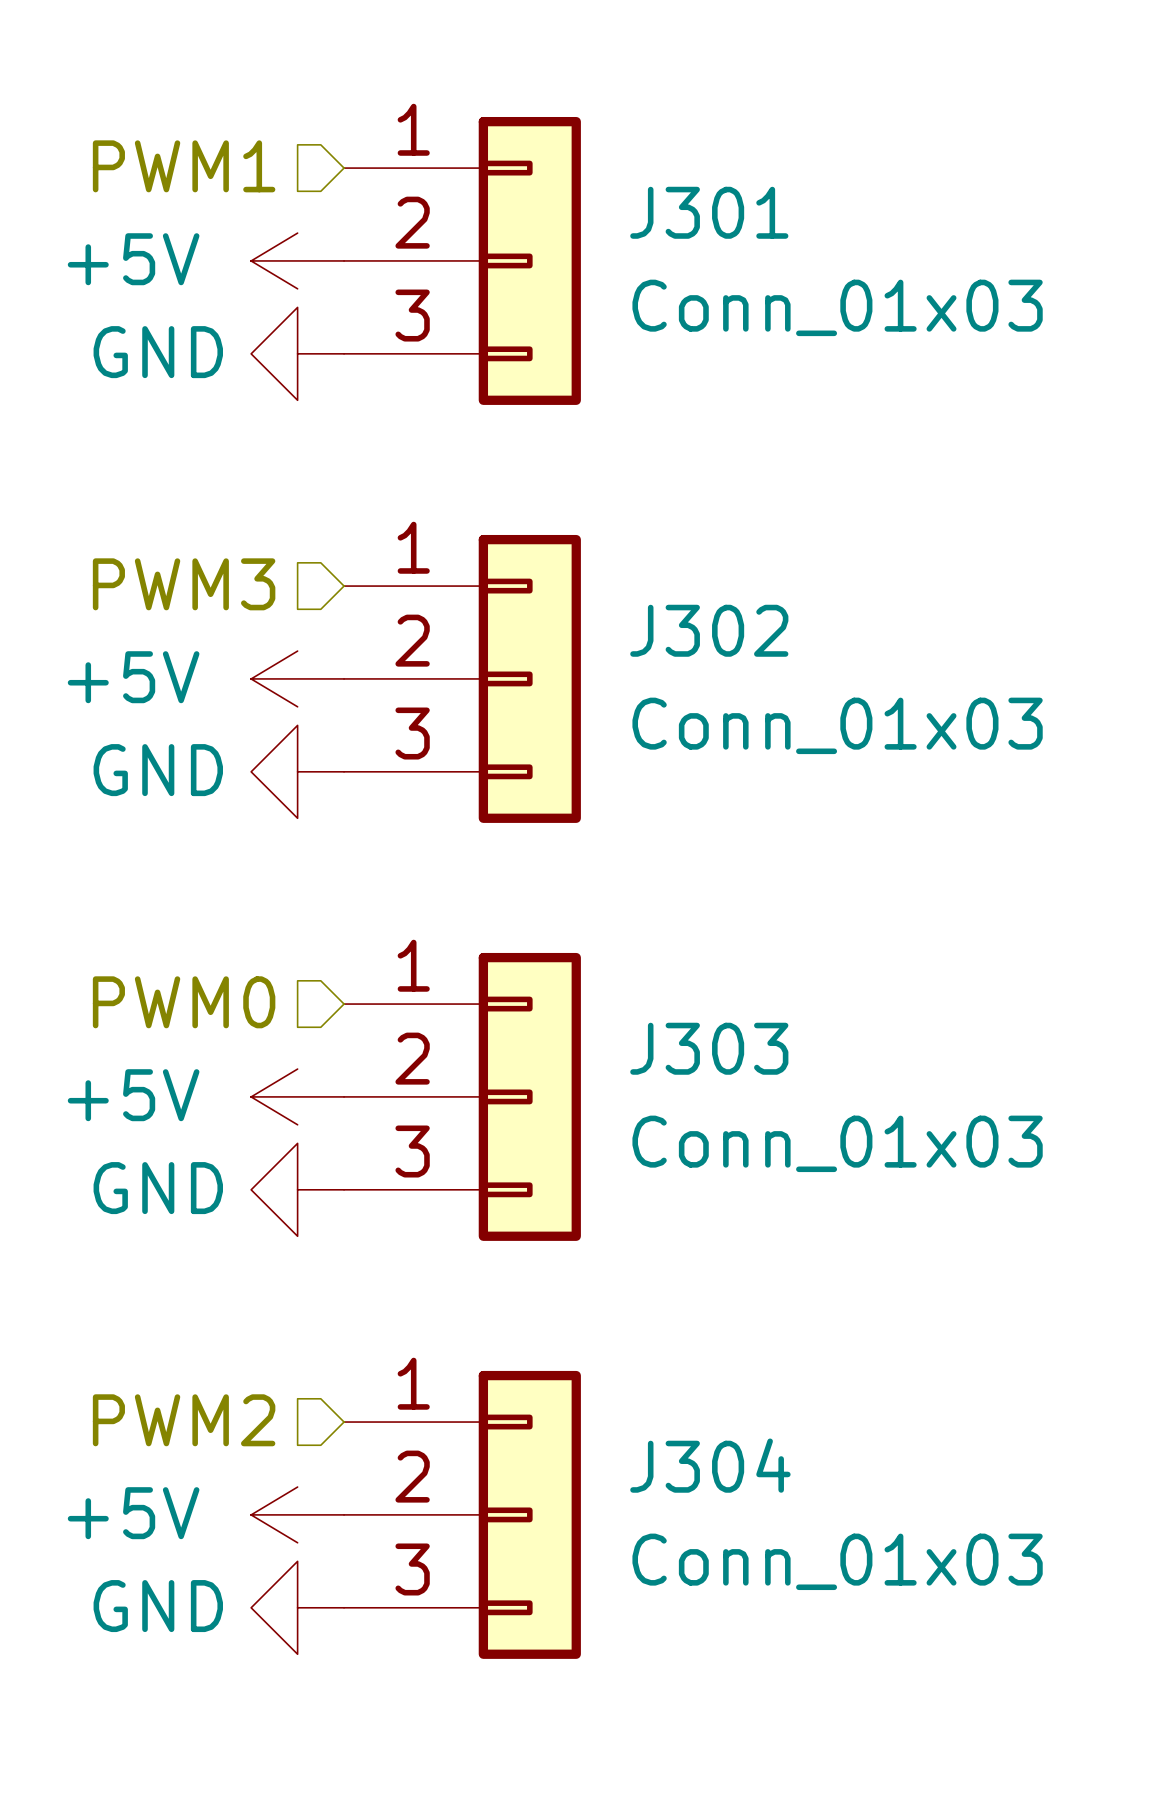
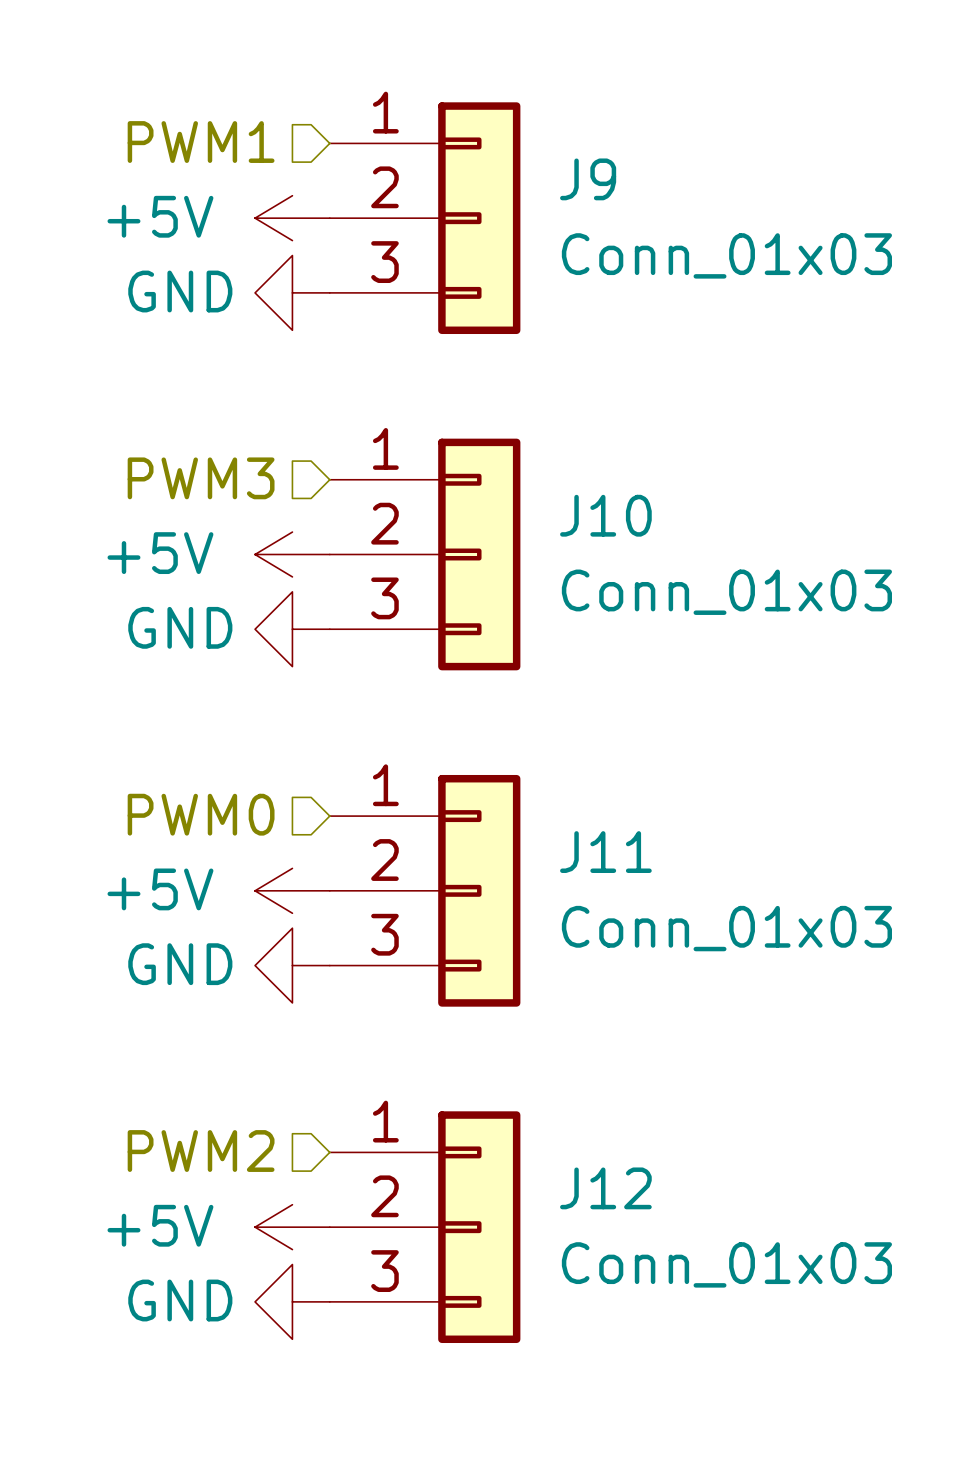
J301 name: J301 (709, 212) -> J9 (588, 179)
J302 name: J302 (709, 630) -> J10 (605, 515)
J303 name: J303 (709, 1048) -> J11 (605, 852)
J304 name: J304 (710, 1465) -> J12 (605, 1188)

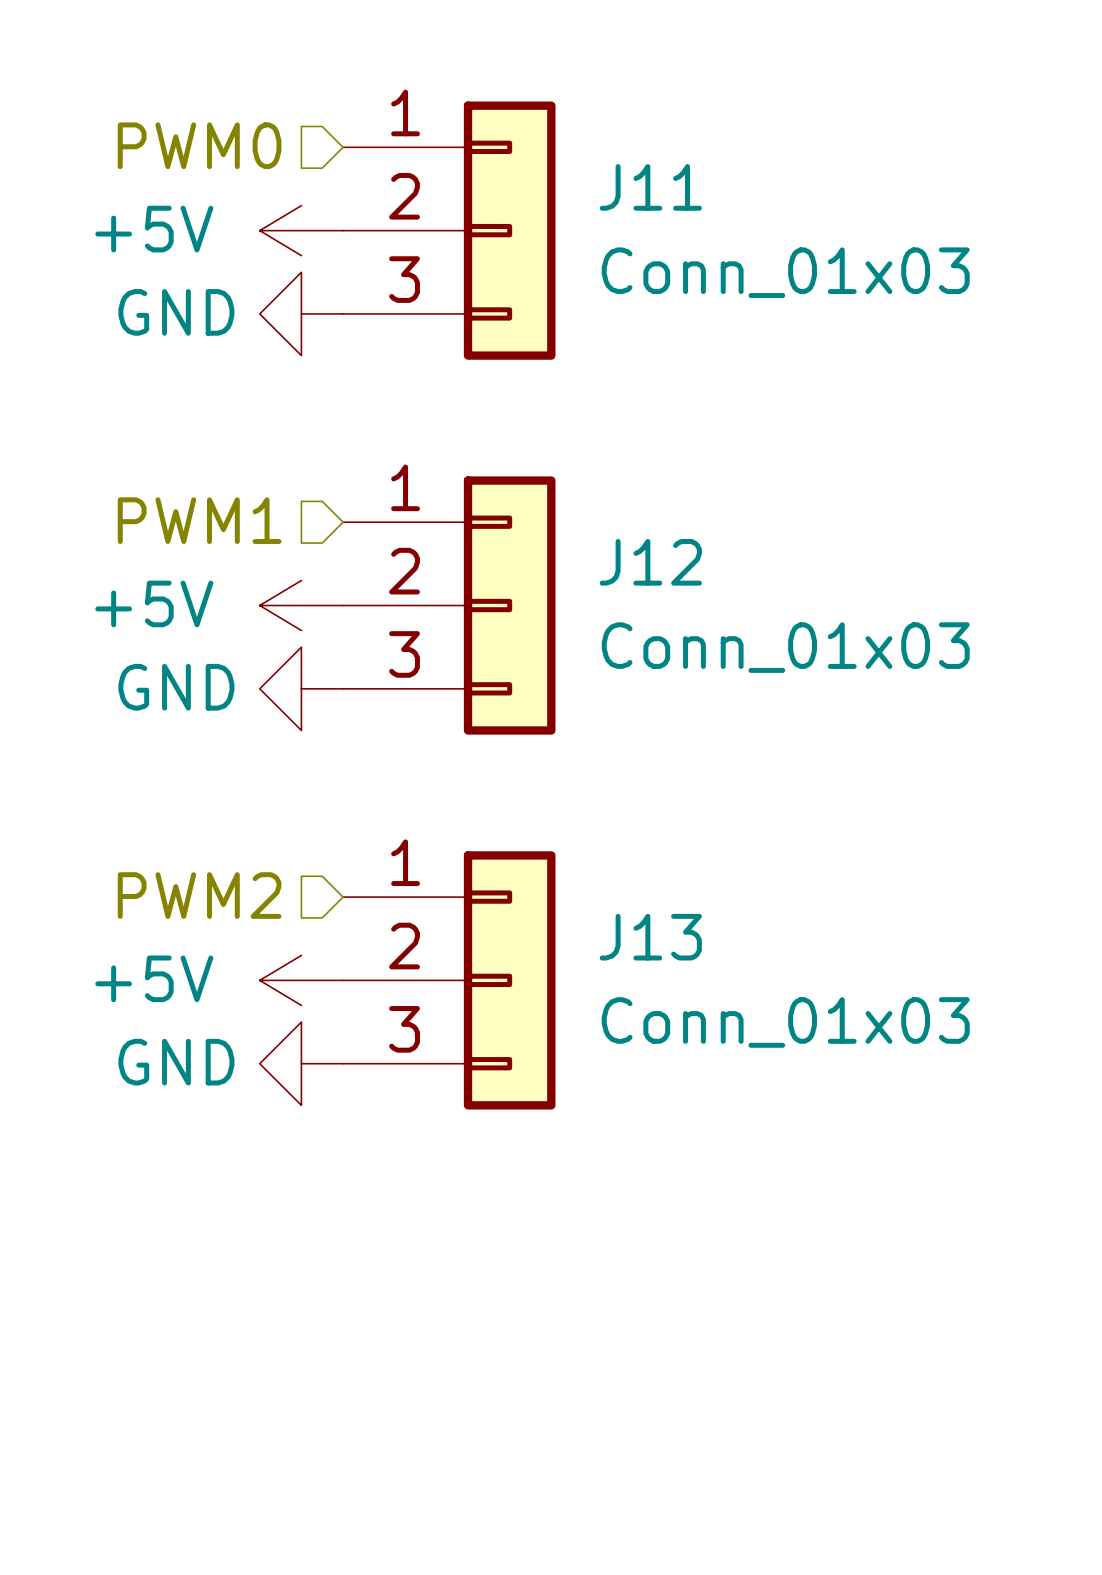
hierarchical label: PWM1 (201, 142) -> PWM0 (199, 145)
J9 name: J9 (588, 179) -> J11 (650, 187)
hierarchical label: PWM3 (201, 478) -> PWM1 (199, 520)
J10 name: J10 (605, 515) -> J12 (650, 562)
hierarchical label: PWM0 (201, 814) -> PWM2 (199, 895)
J11 name: J11 (605, 852) -> J13 (650, 937)
hierarchical label: PWM2 (201, 1151) -> none
power symbol: +5V (292, 1227) -> none
J12: Conn_01x03 (425, 1227) -> none
power symbol: GND (292, 1301) -> none

